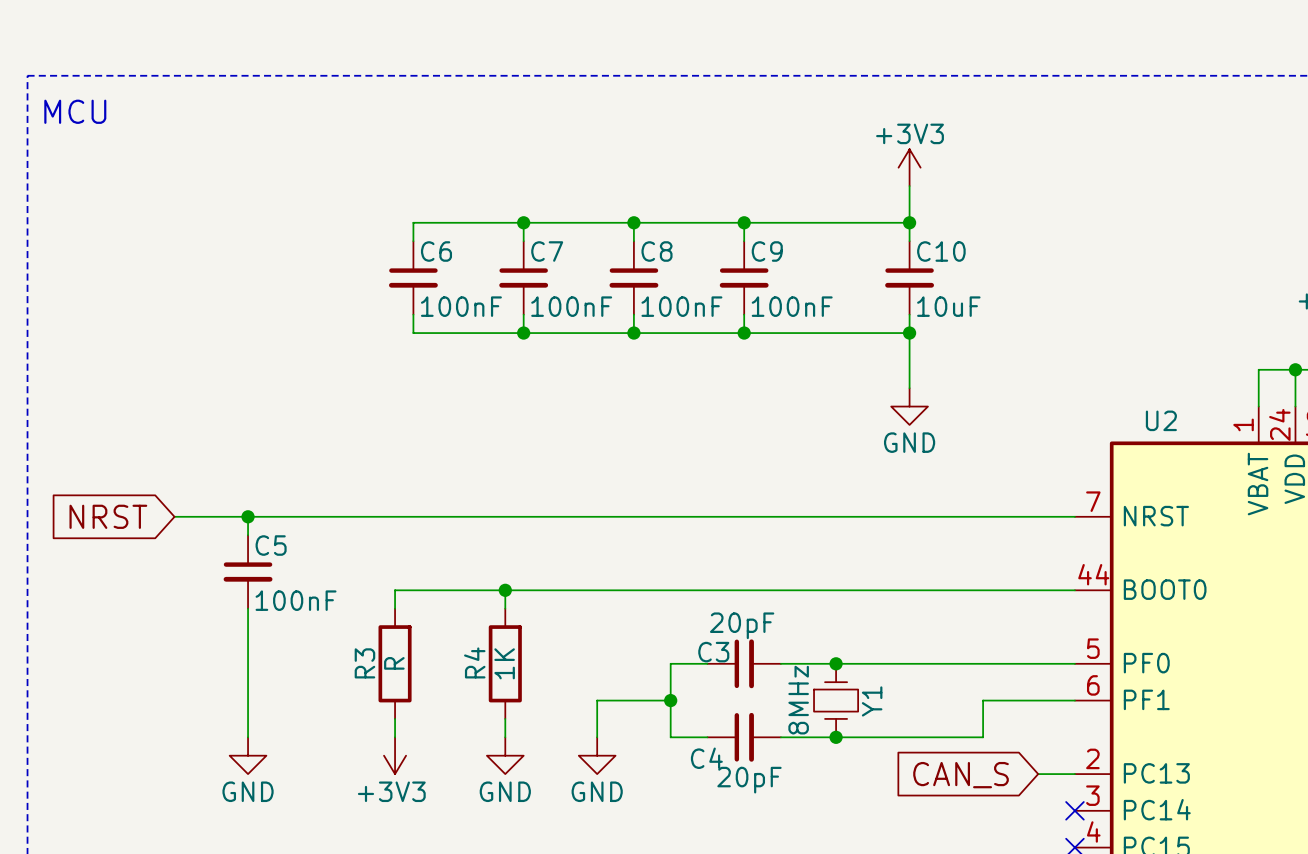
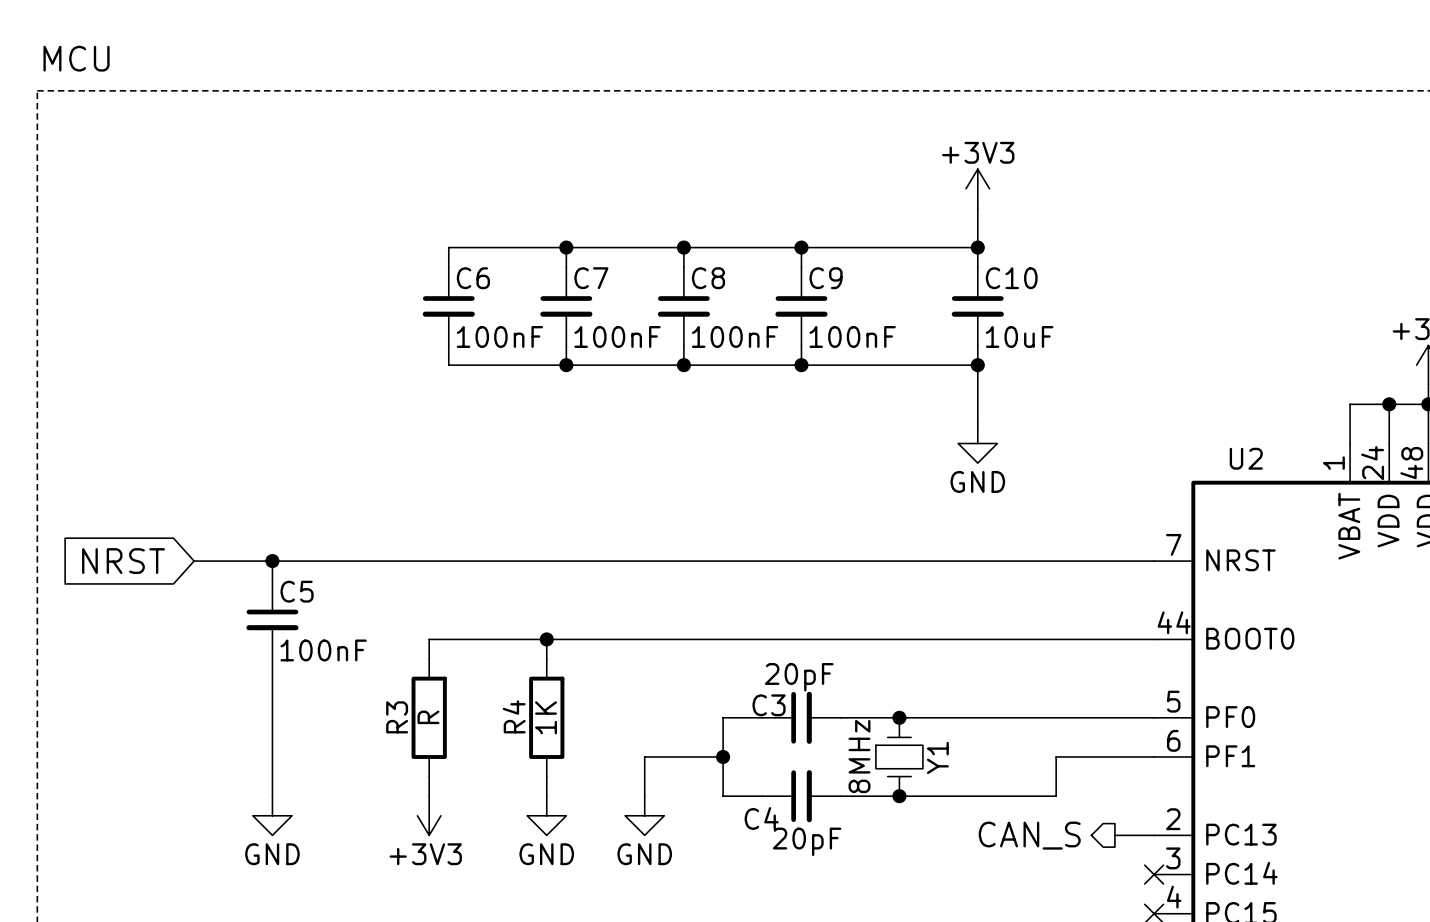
text position: MCU (75, 111) -> MCU (76, 58)
hierarchical label: none -> CAN_S (1029, 835)
global label: CAN_S (961, 775) -> none

